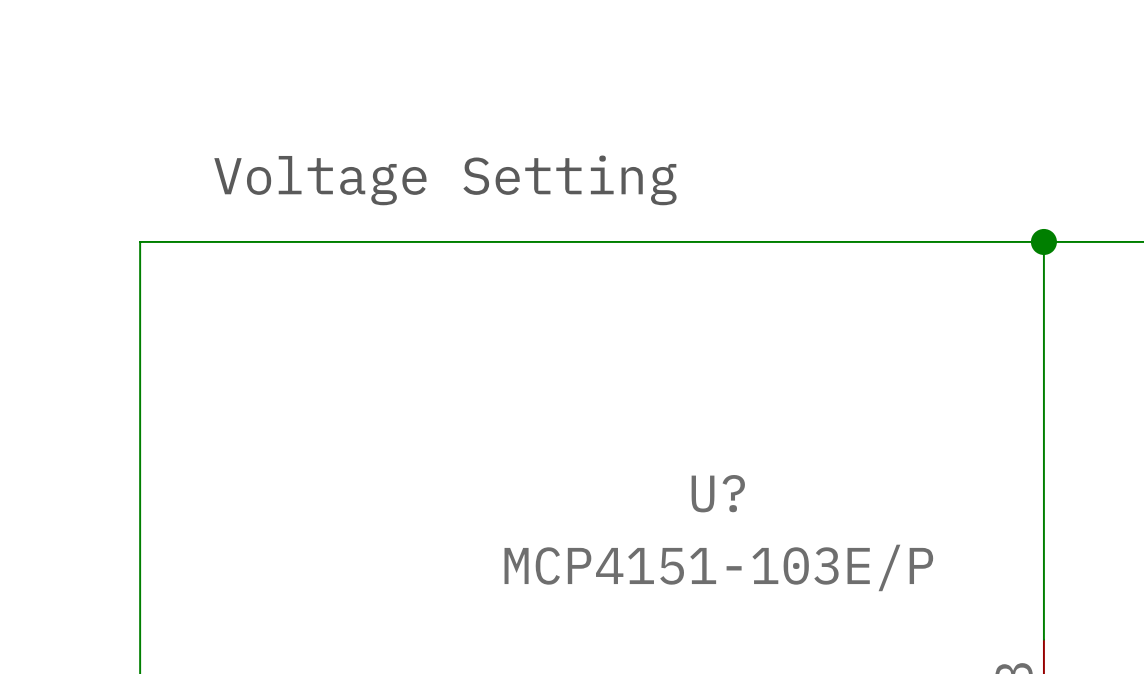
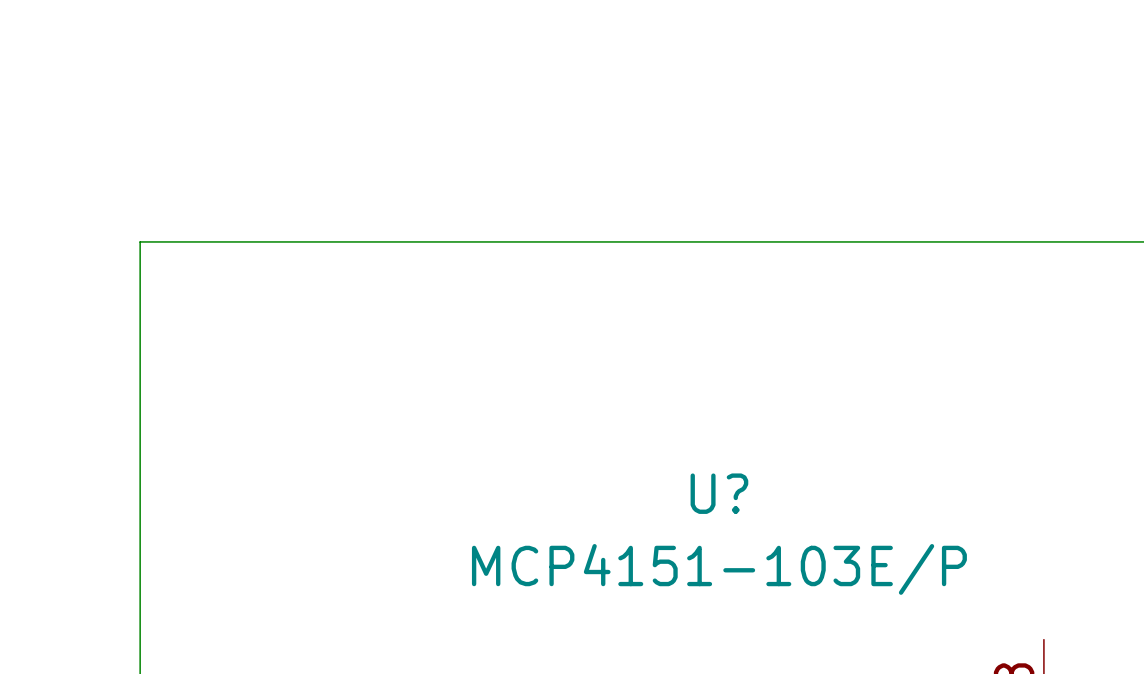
text: Voltage Setting (445, 180) -> none
wire: (1043, 241) (1043, 639) -> none
junction: (1043, 241) -> none

